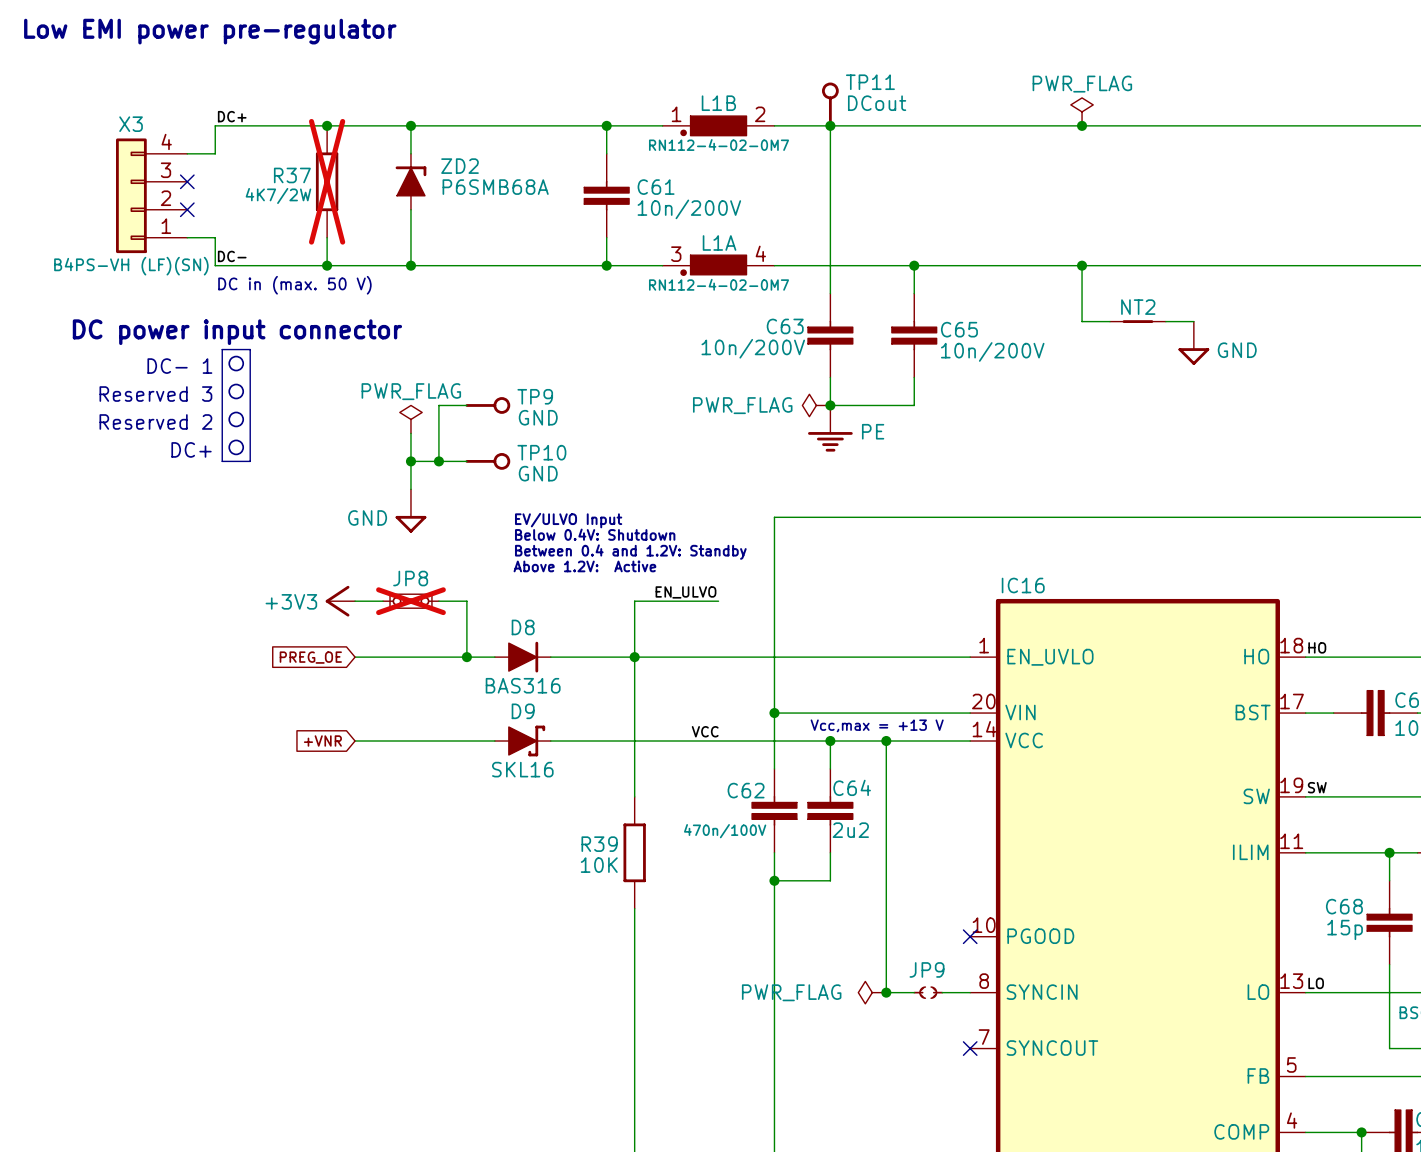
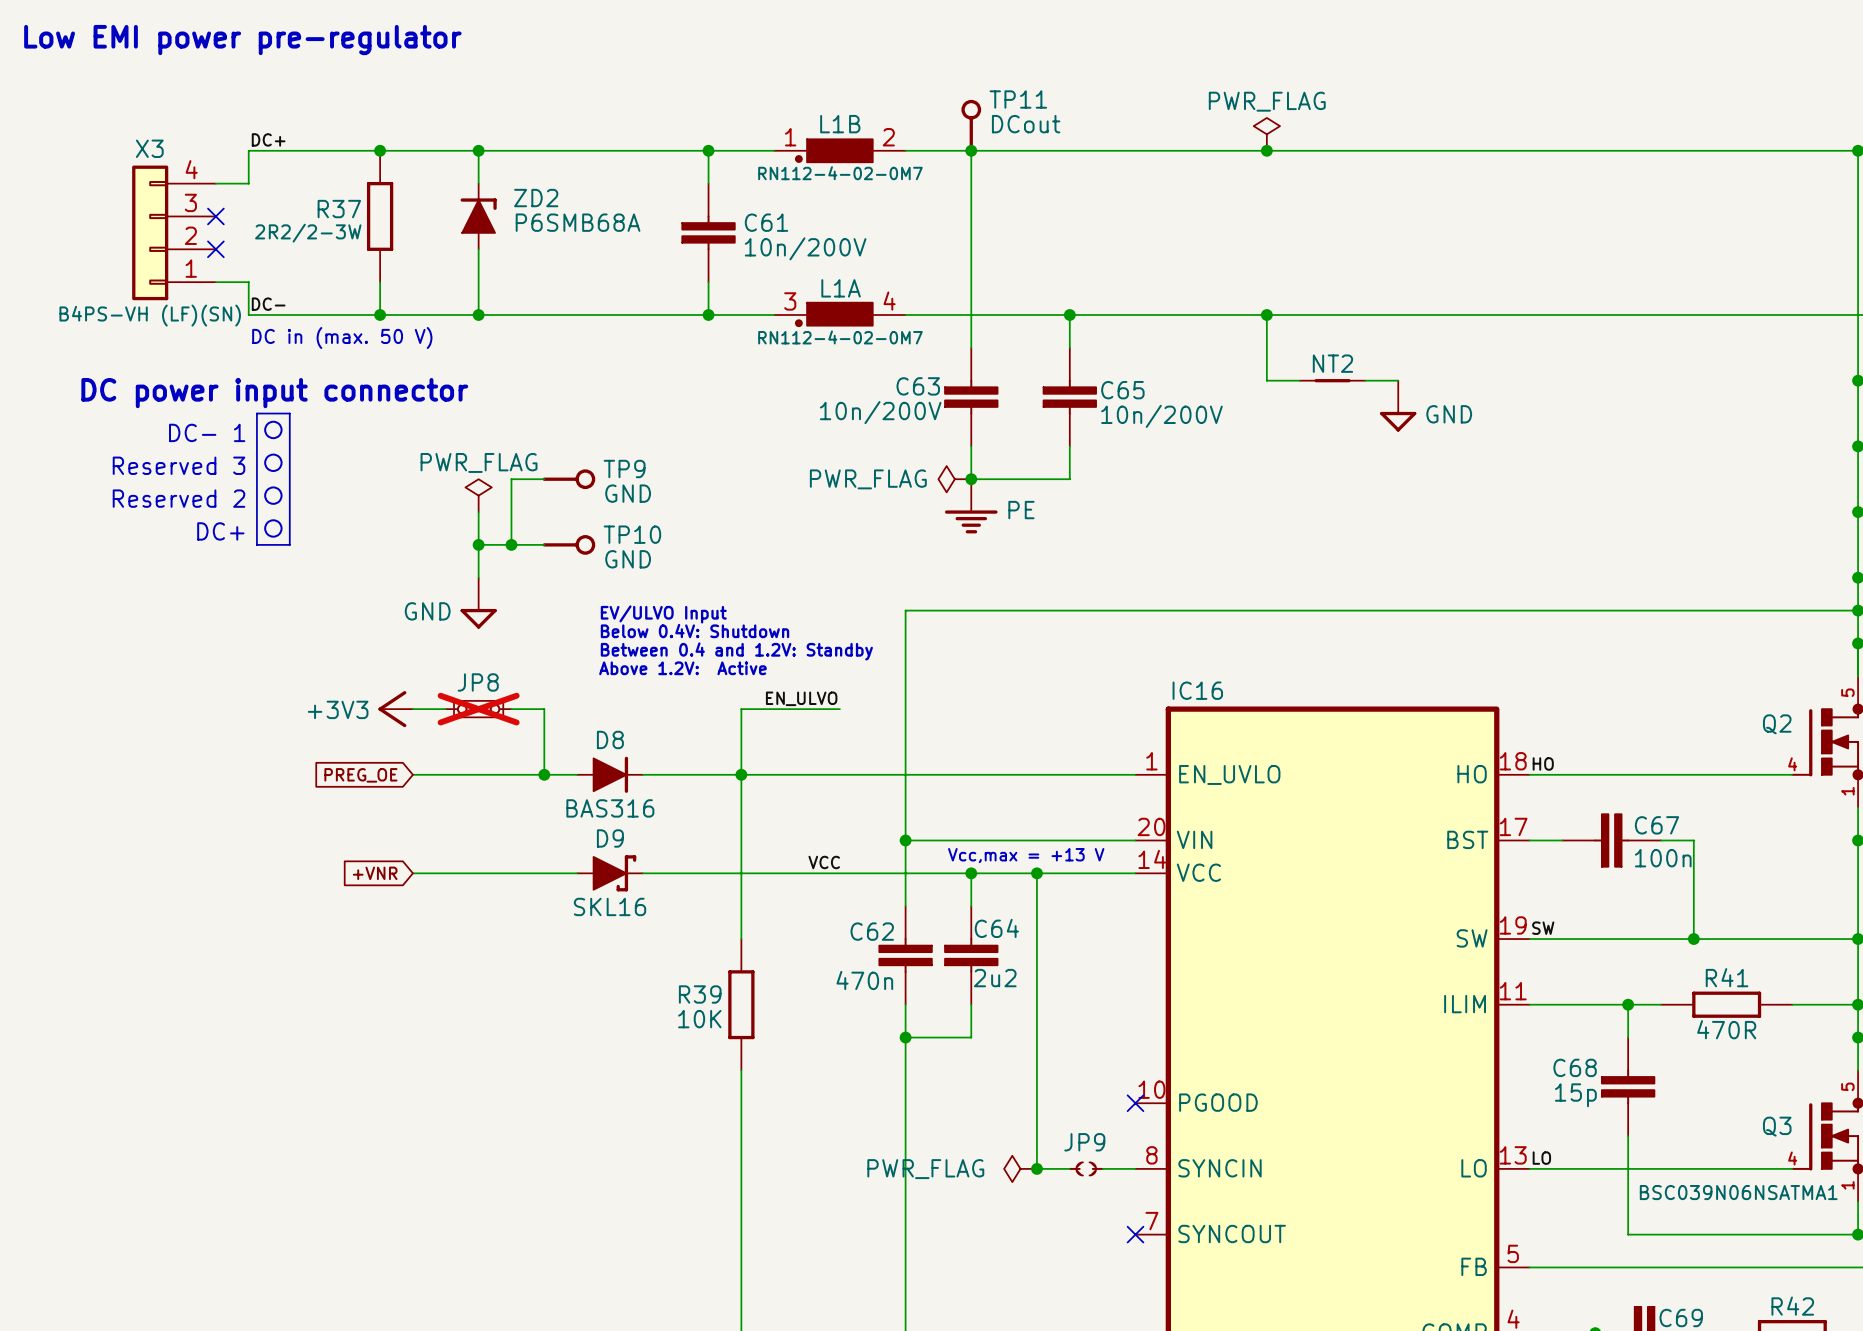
R37 do-not-place cross: (327, 181) -> none
R37 value: 4K7/2W (278, 195) -> 2R2/2-3W (308, 233)
C62 value: 470n/100V (725, 831) -> 470n (864, 980)

